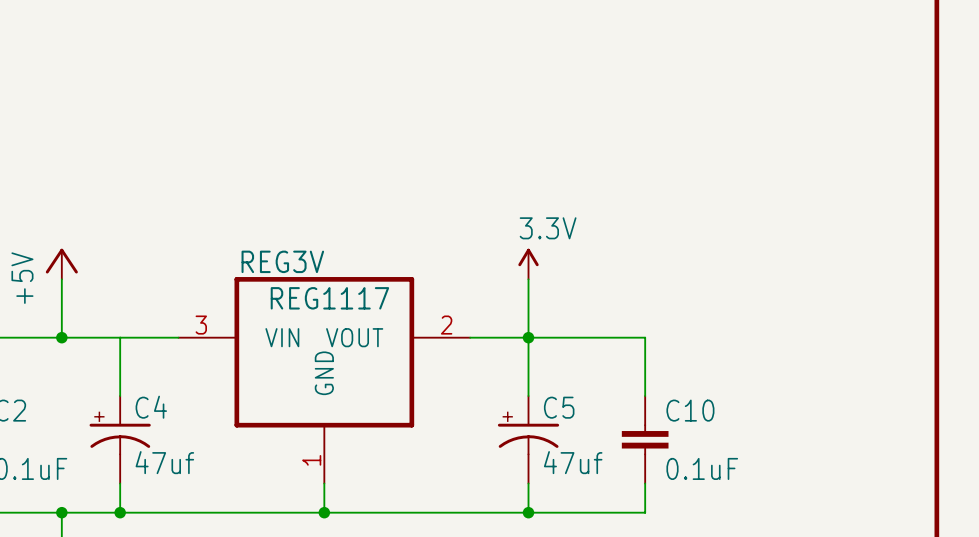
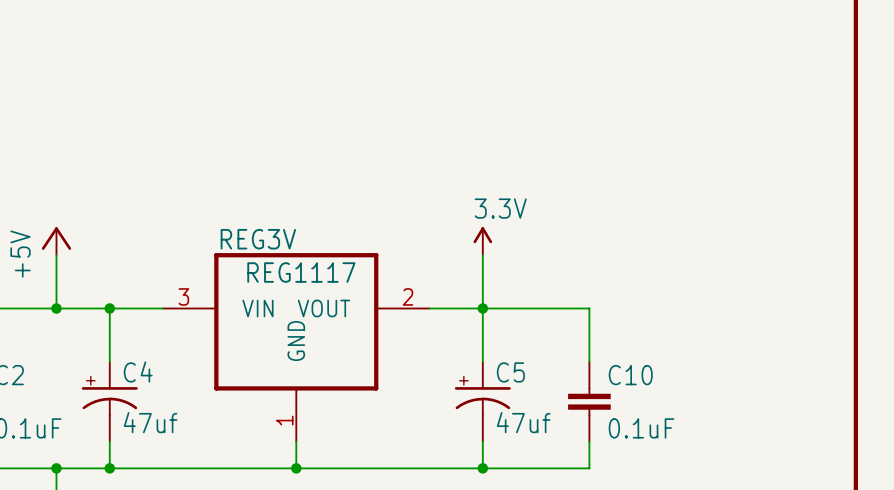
junction: none -> (109, 308)

